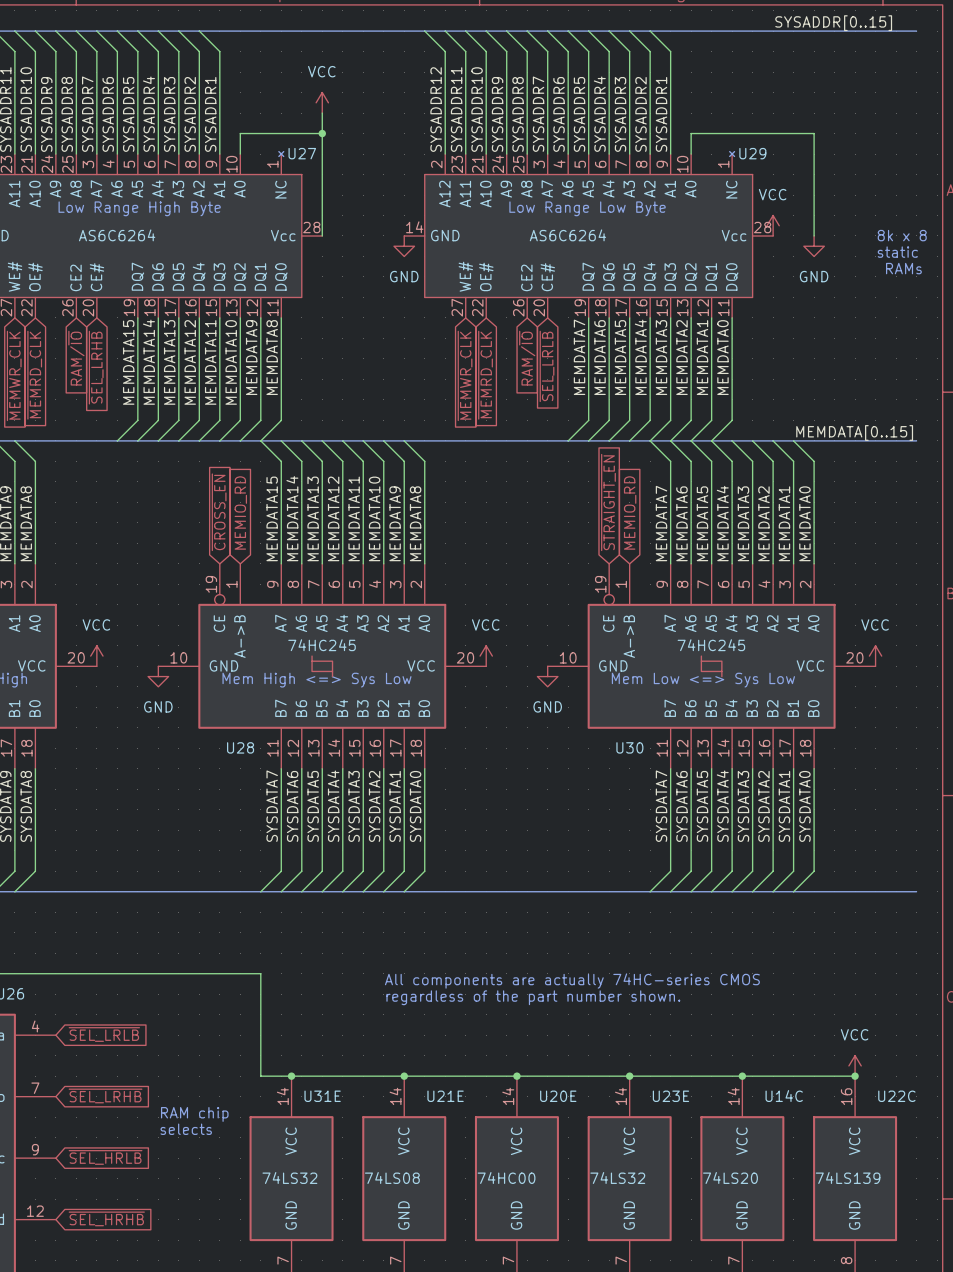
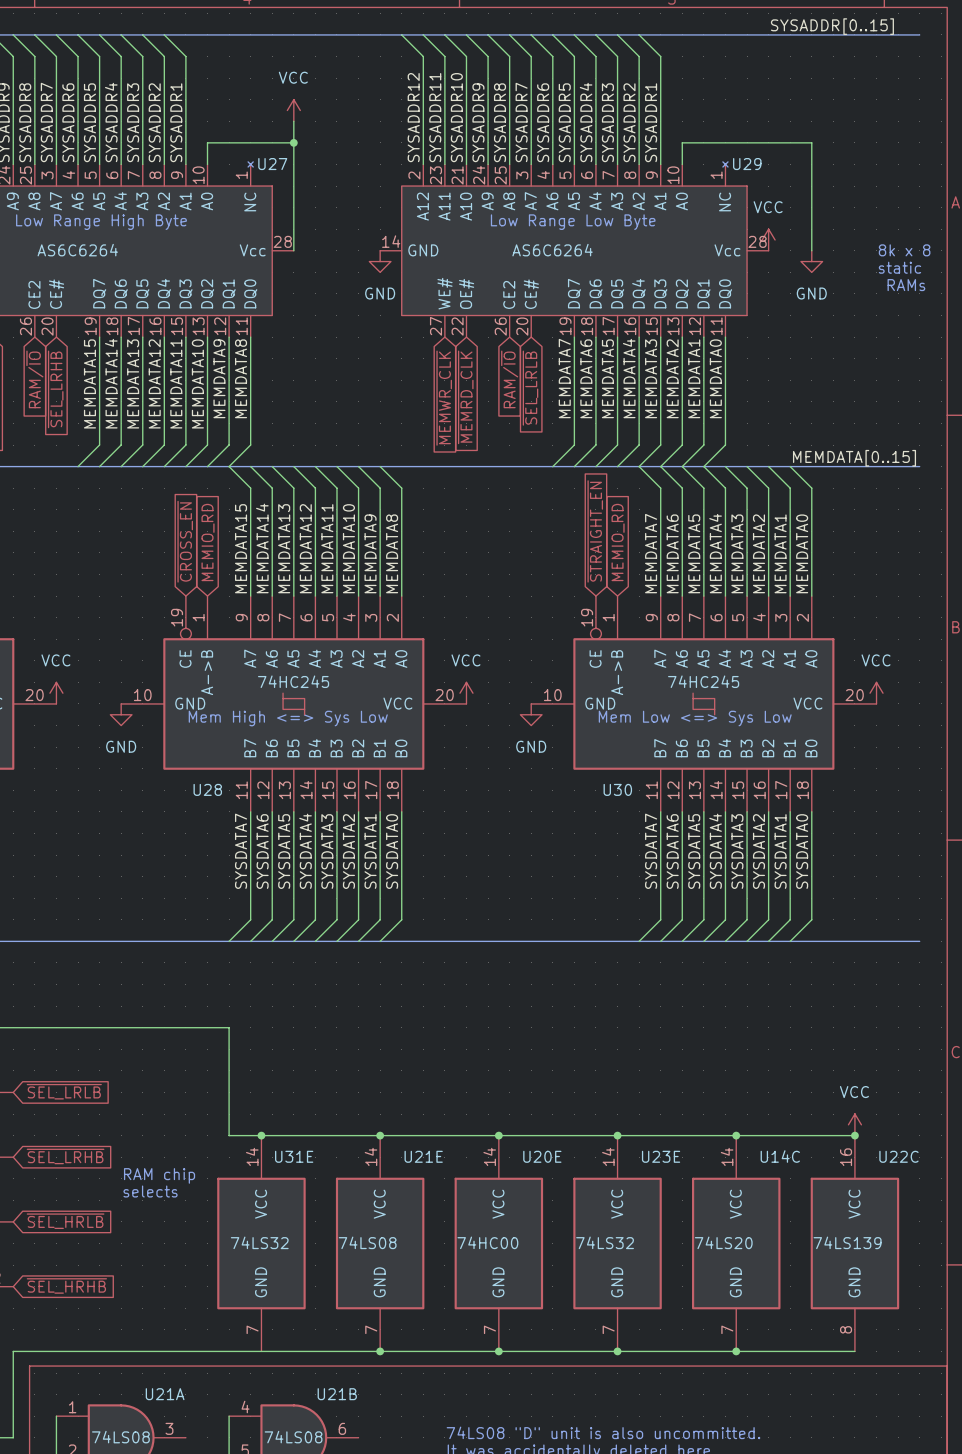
text: All components are actually 74HC-series CMOS (572, 981) -> none
text: regardless of the part number shown. (533, 997) -> none

